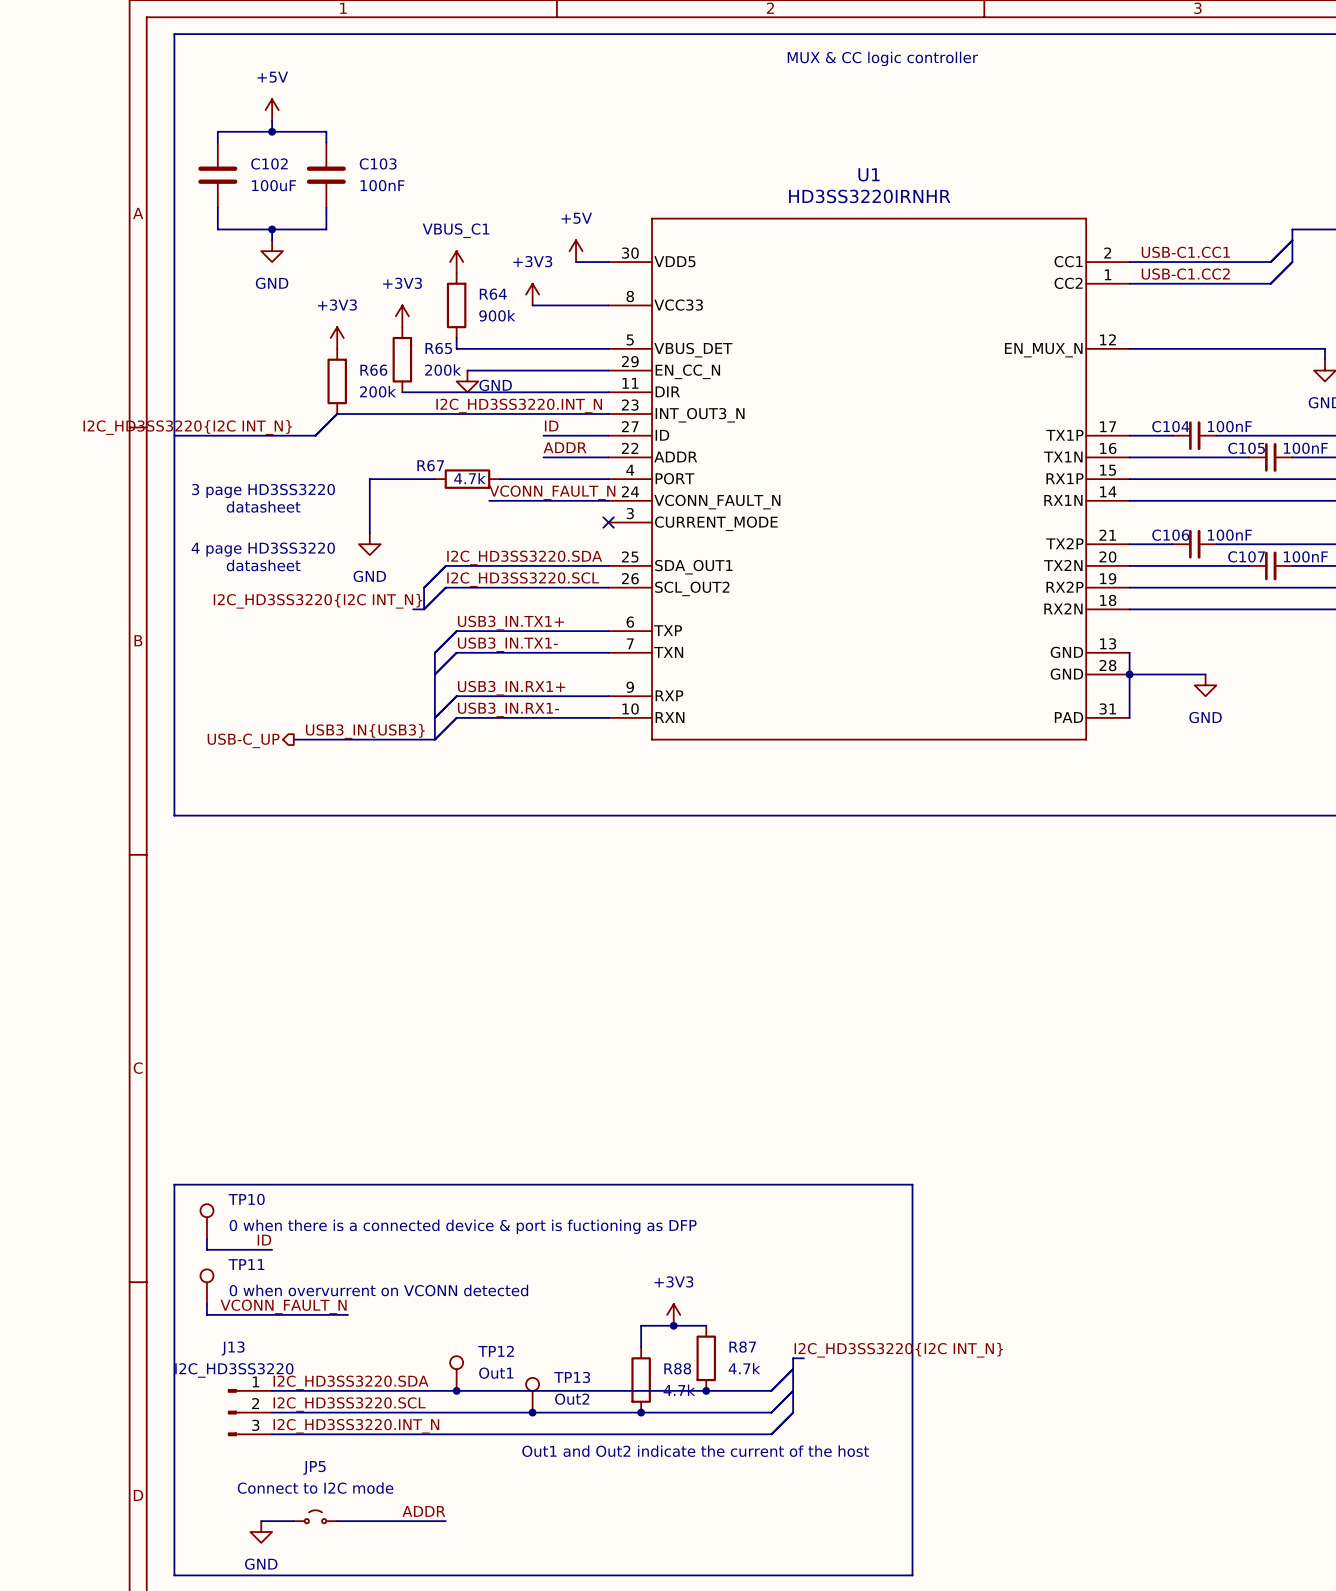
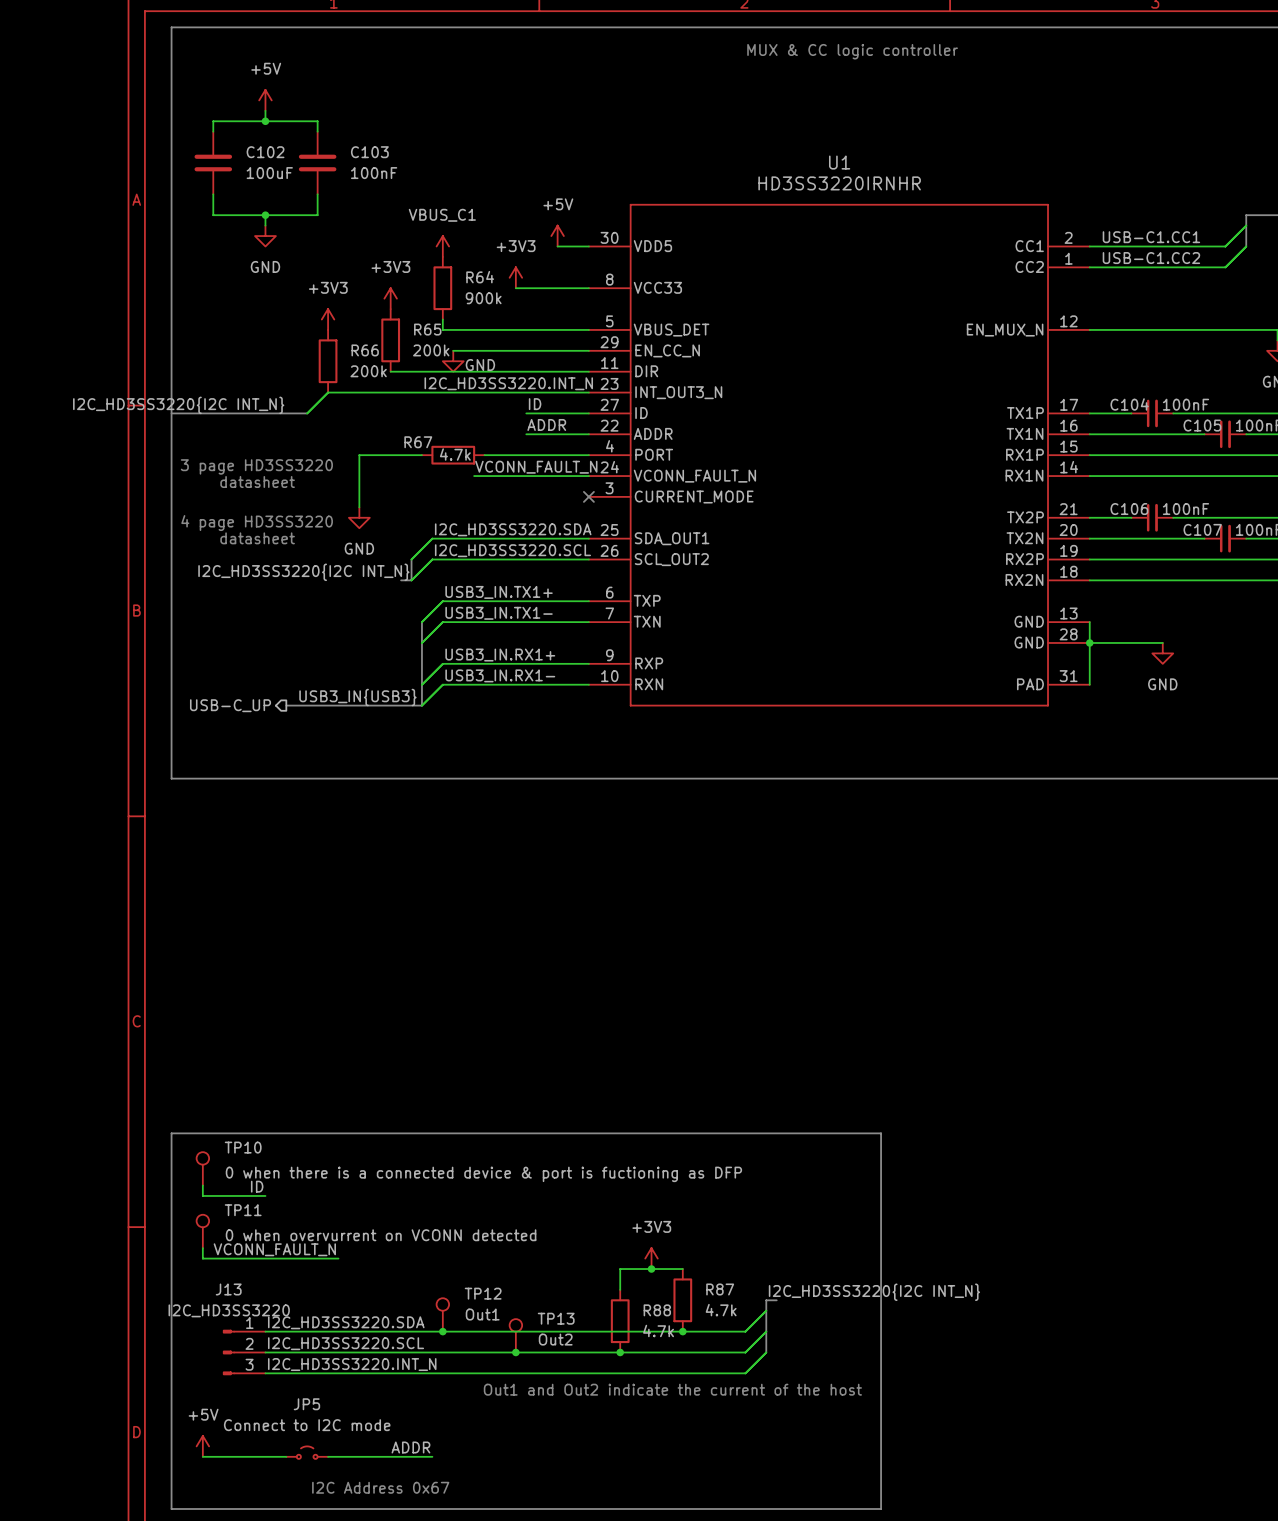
power symbol: none -> +5V (202, 1446)
wire: none -> (202, 1456) (255, 1456)
power symbol: GND (261, 1532) -> none
text: none -> I2C Address 0x67 (380, 1487)

